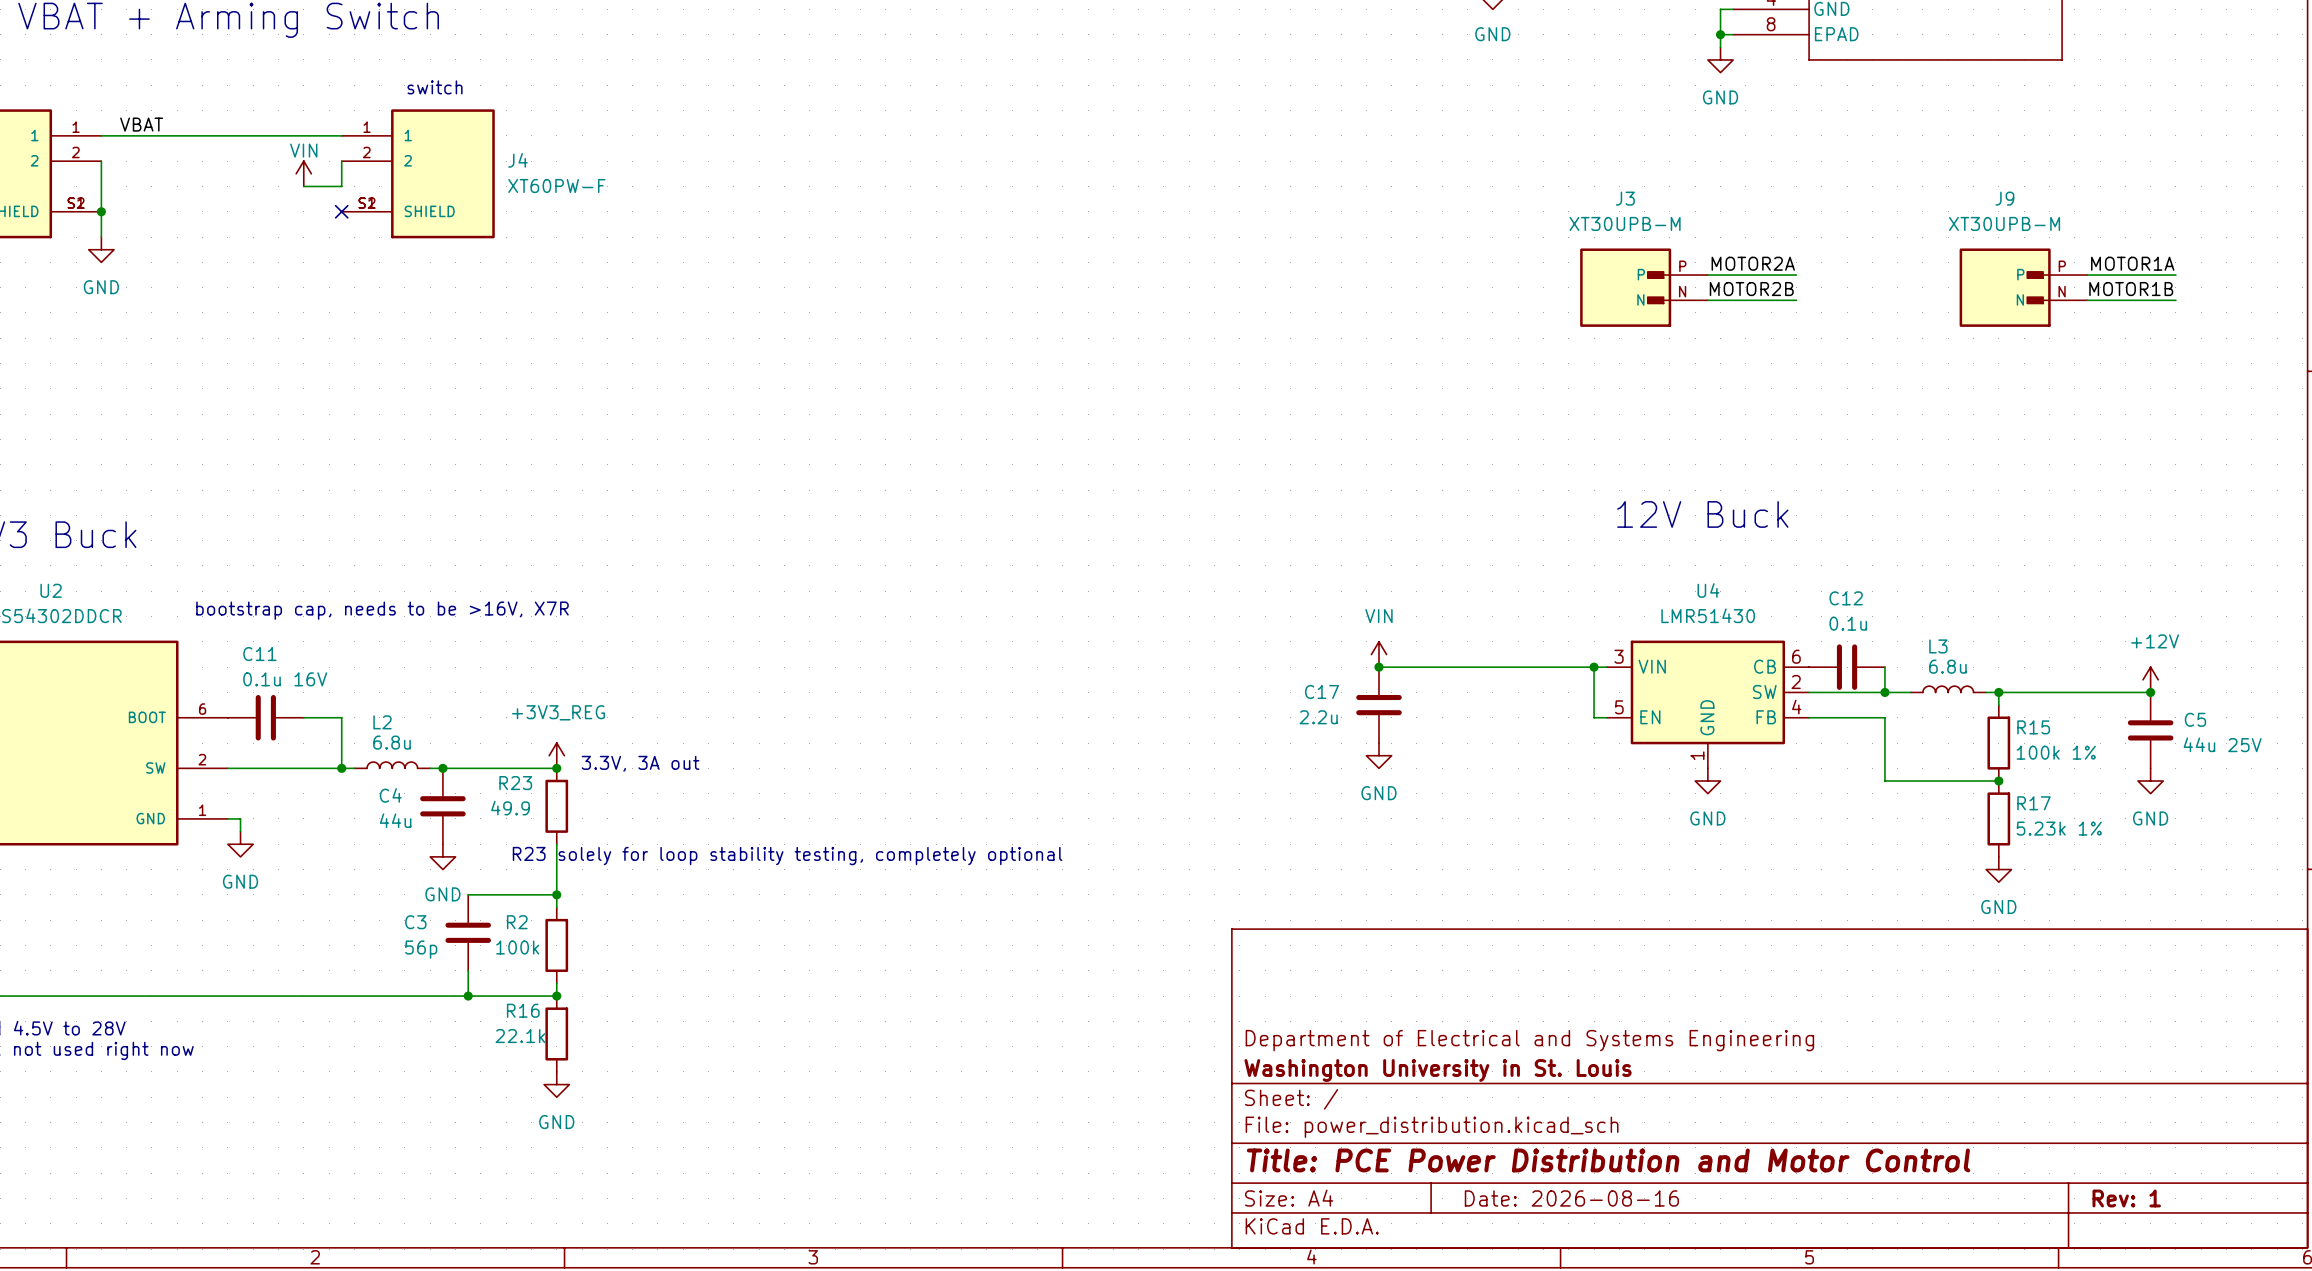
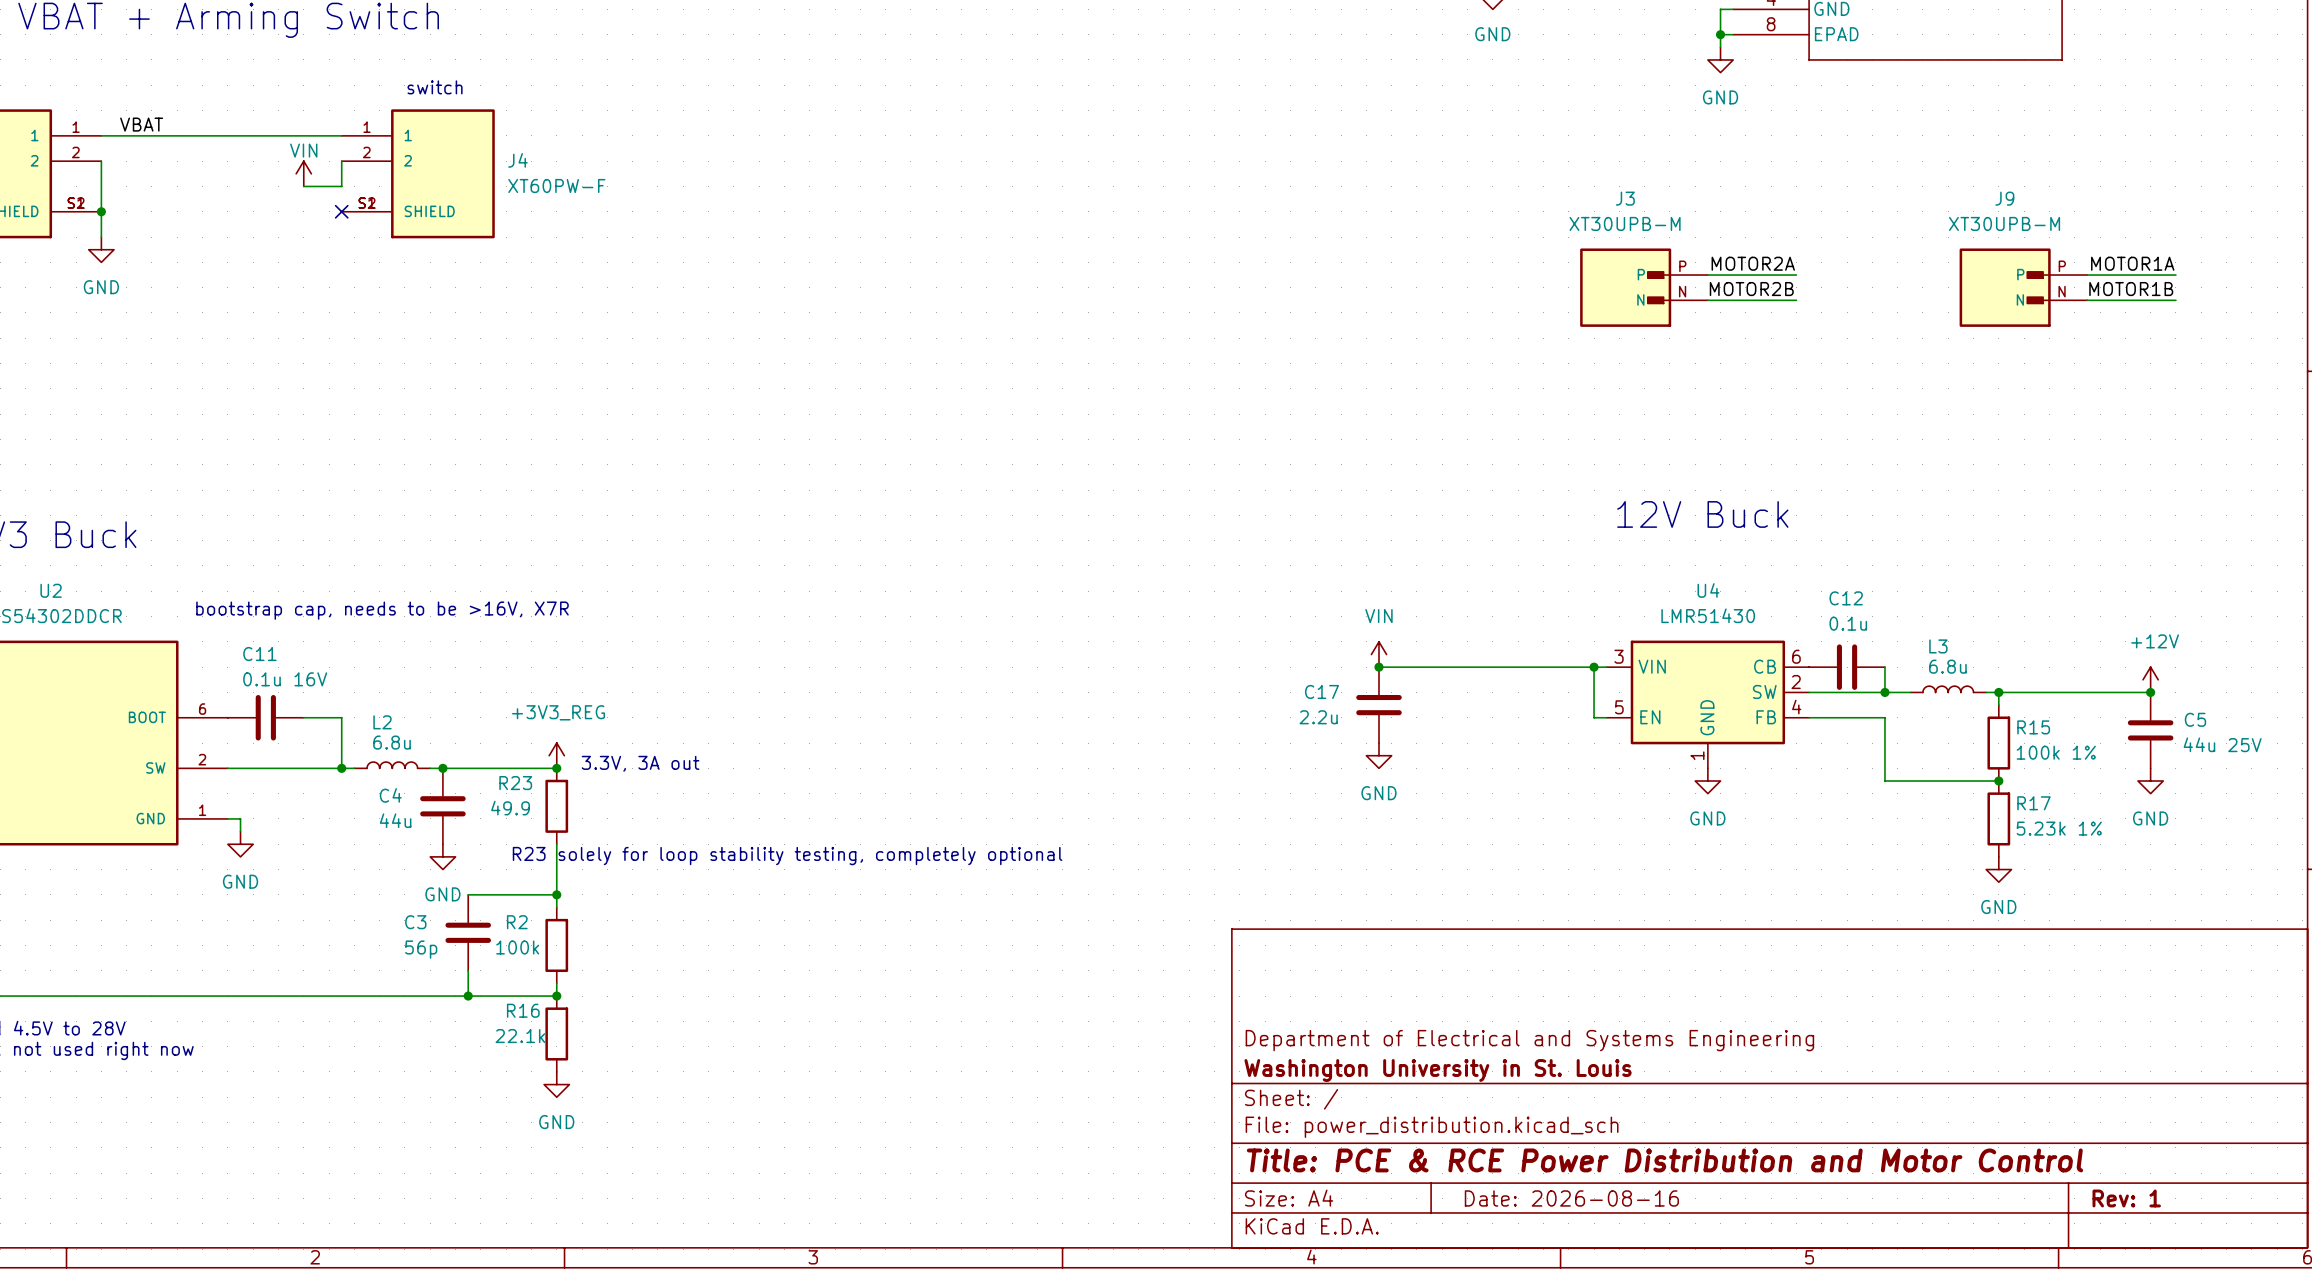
title block: Title: PCE Power Distribution and Motor Control (1608, 1160) -> Title: PCE & RCE Power Distribution and Motor Control (1664, 1160)

